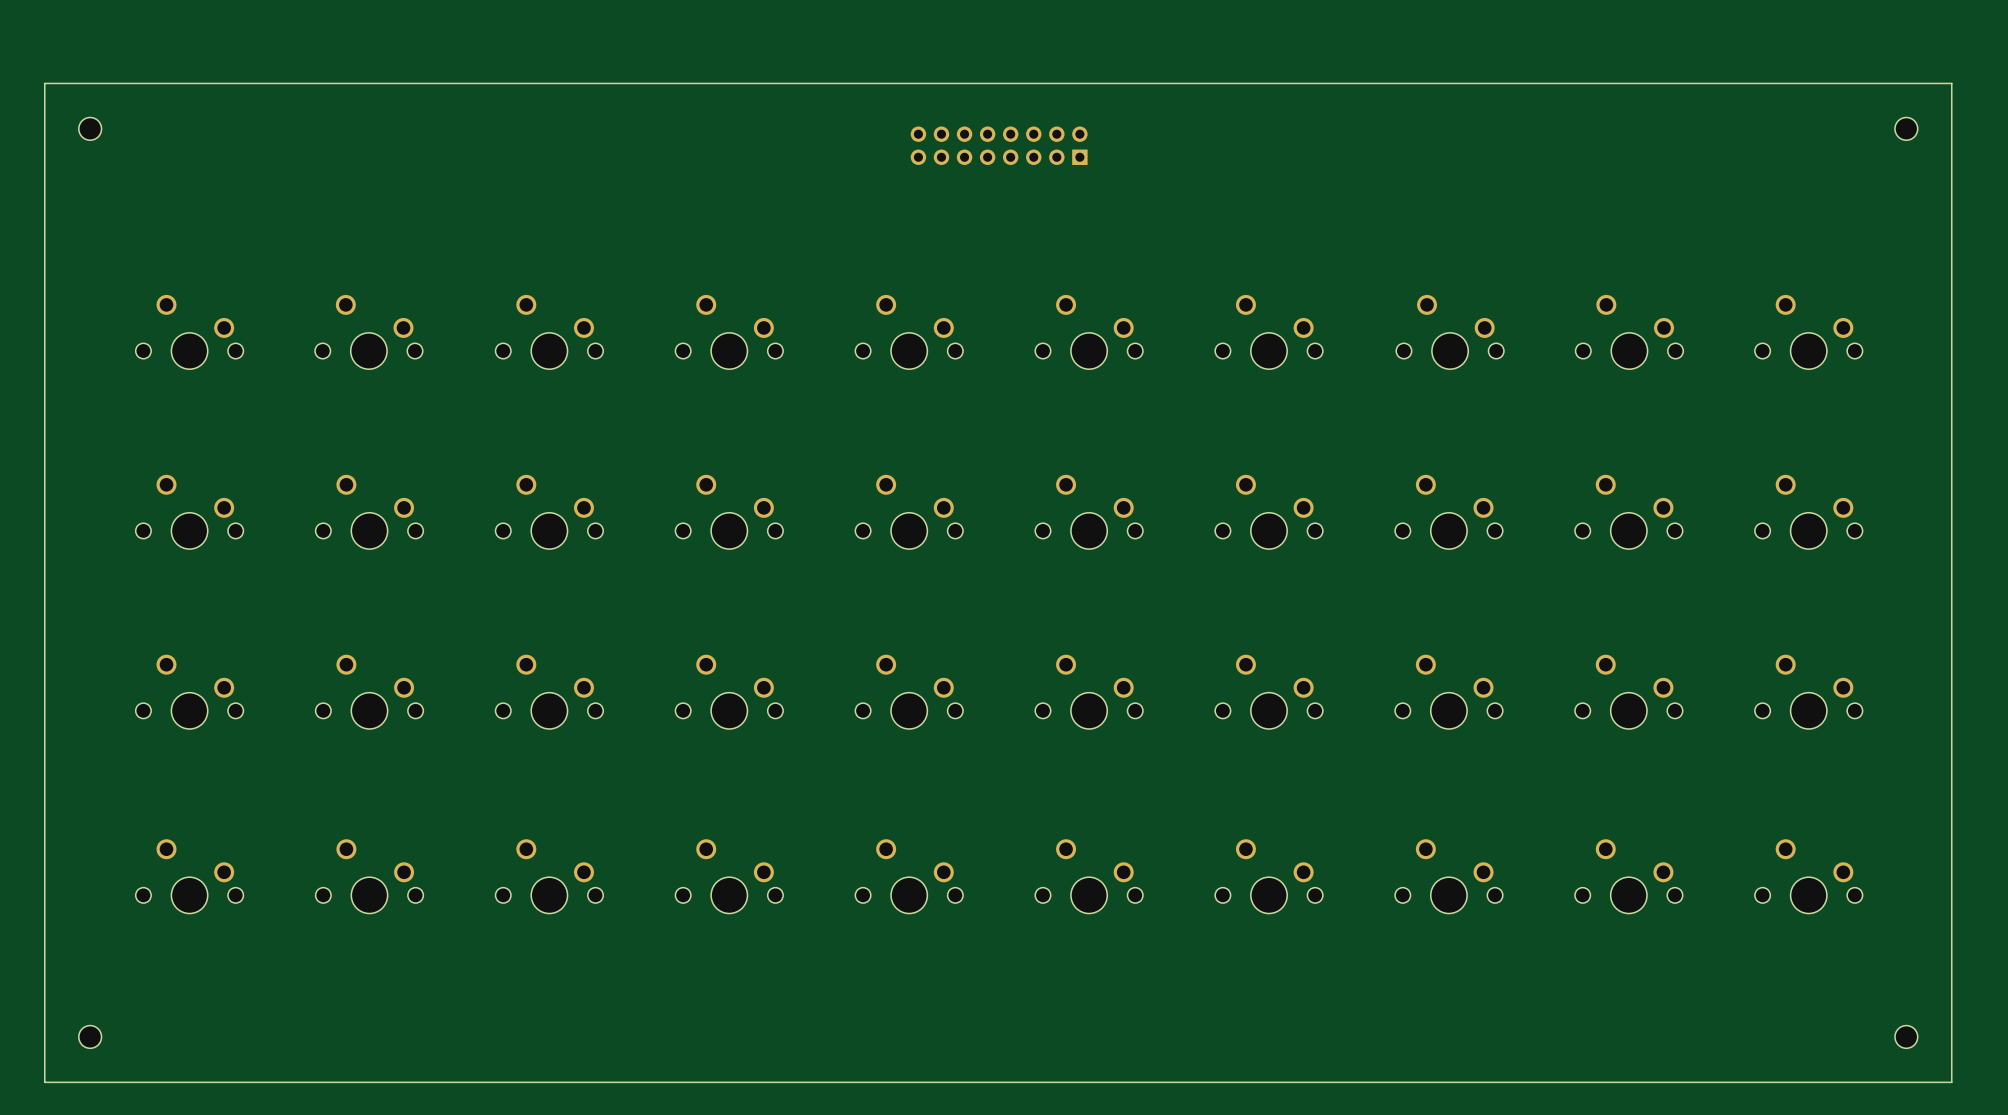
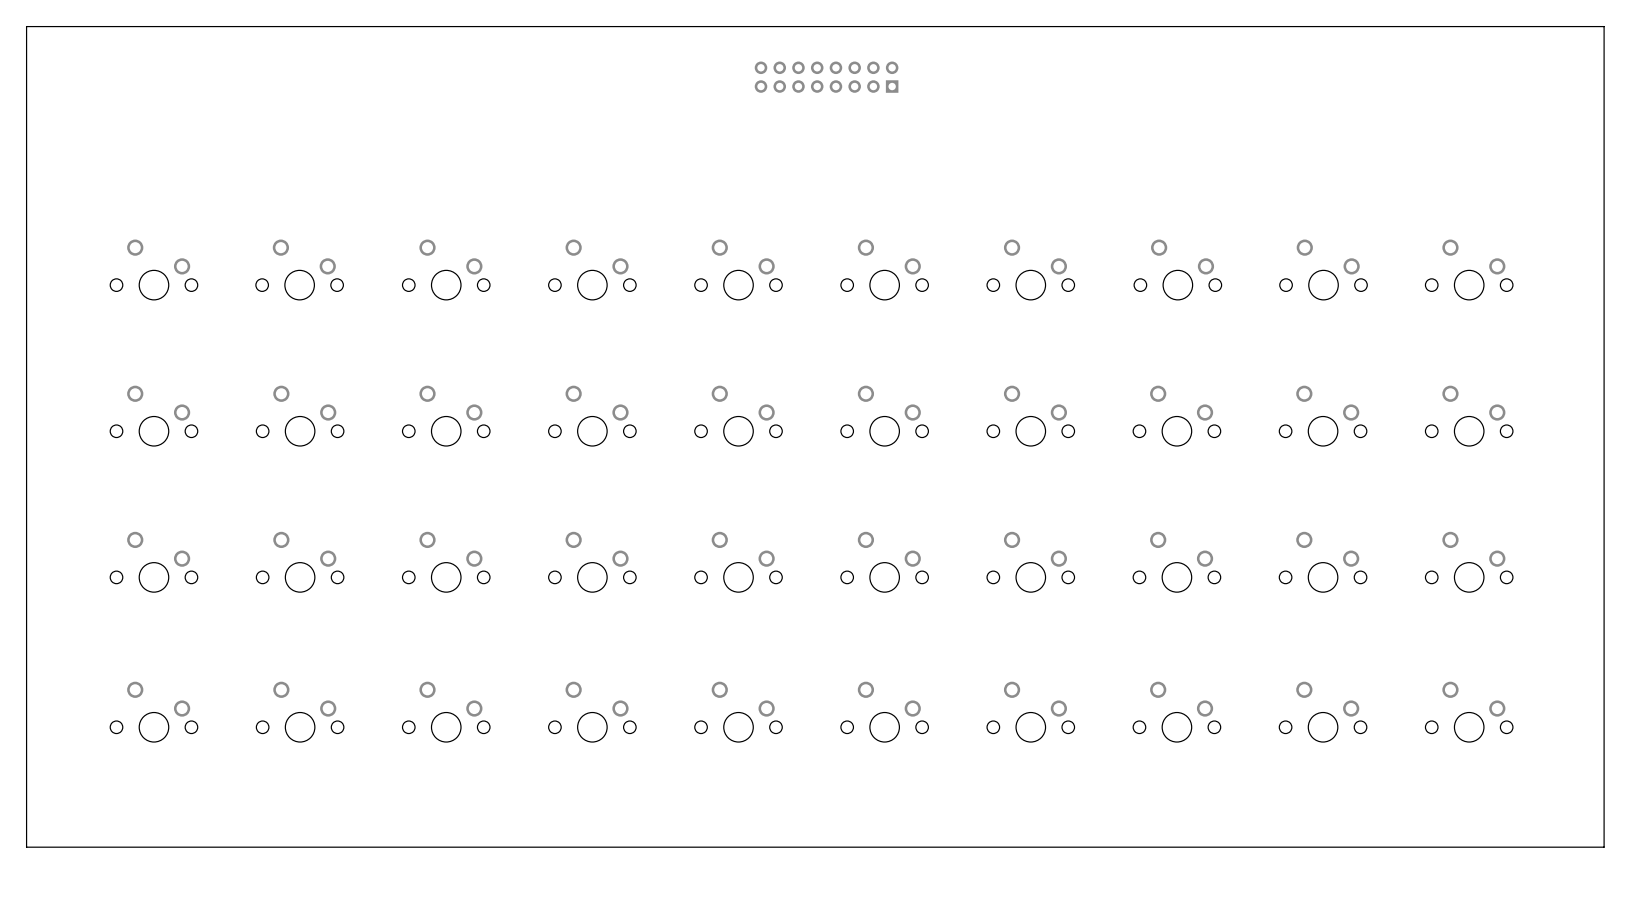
board edge: (1951, 83) (44, 83) (44, 1082) (1951, 1082) (1951, 83) -> (1604, 26) (1604, 847) (26, 847) (26, 26) (1604, 26)
part: (90, 128) -> none
part: (1906, 128) -> none
part position: (999, 145) -> (826, 77)
part: (90, 1036) -> none
part: (1906, 1036) -> none

